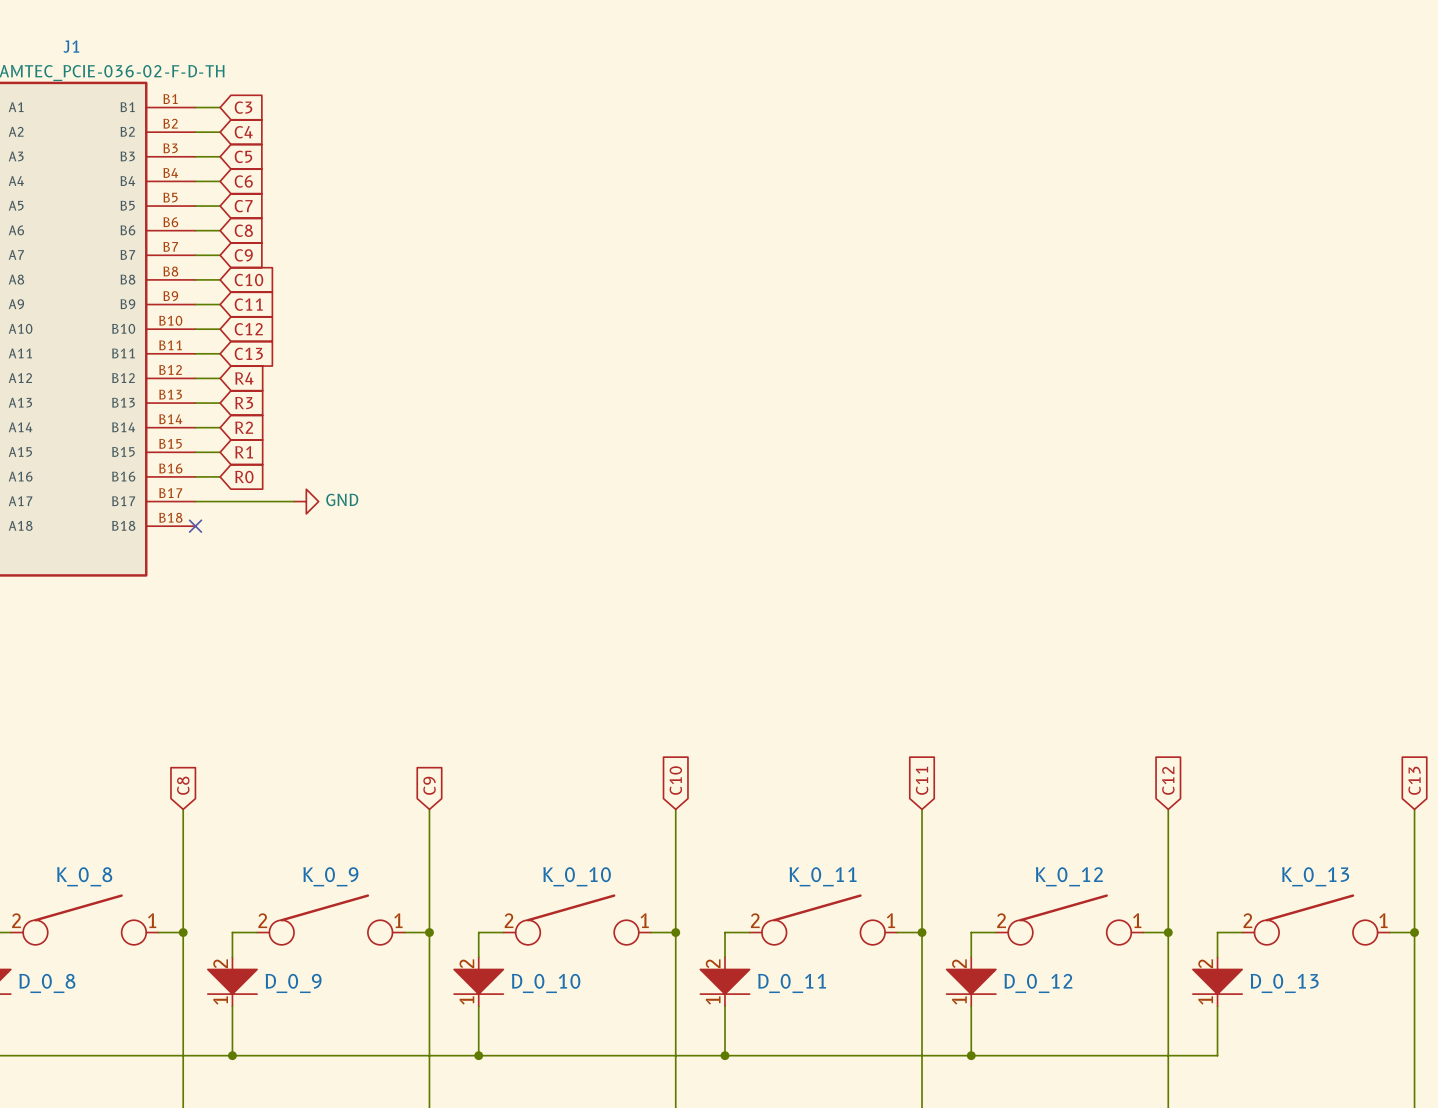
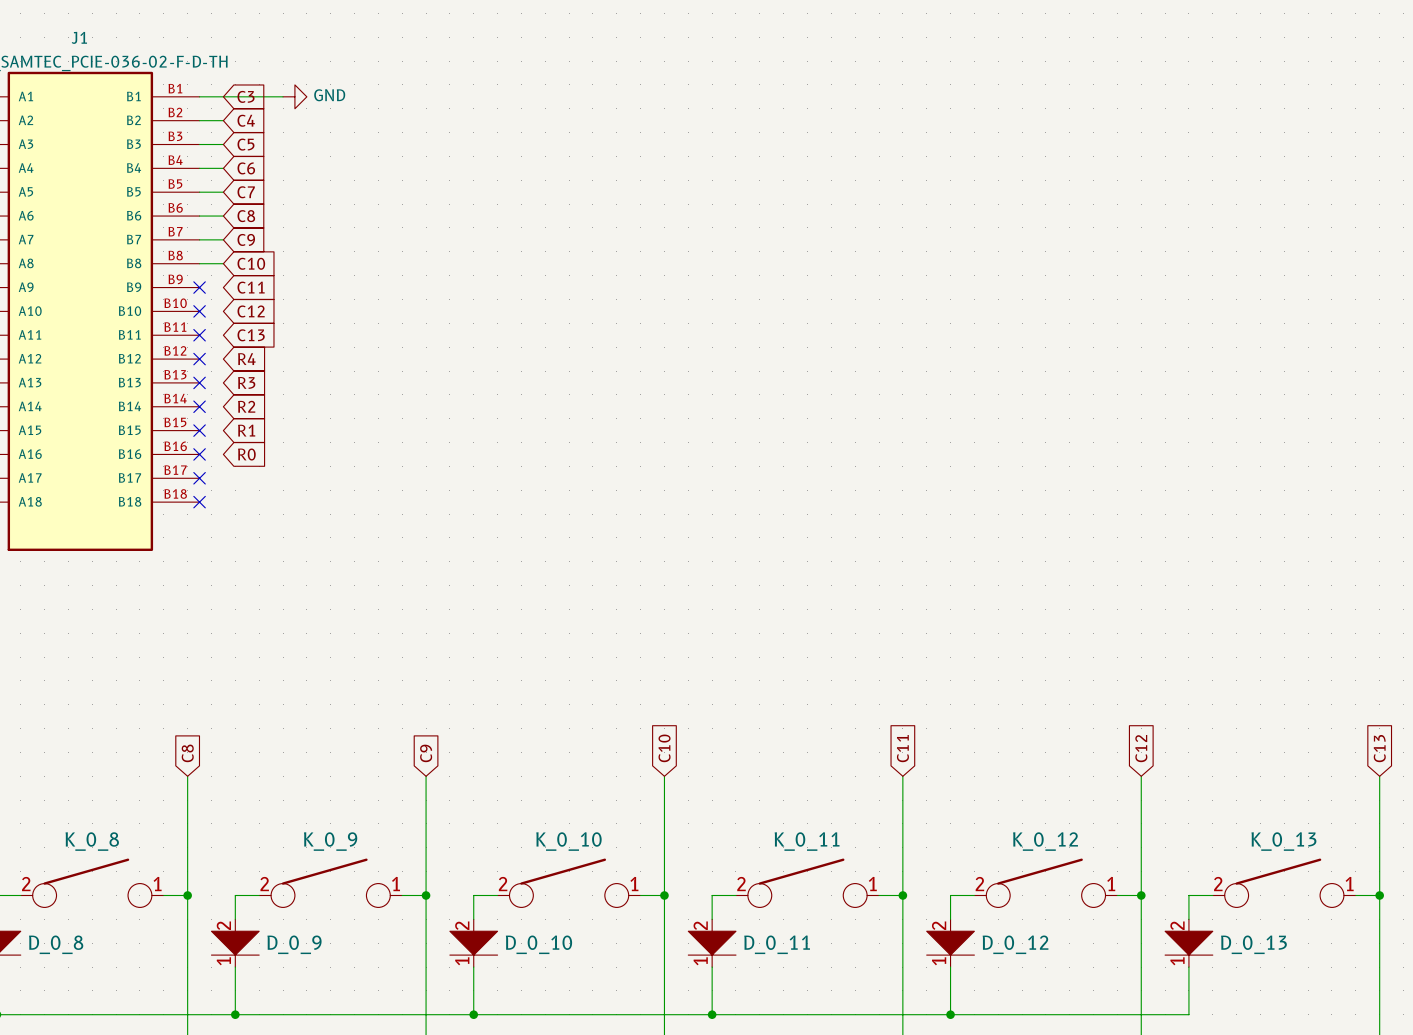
wire: none -> (223, 96) (283, 96)
power symbol: none -> GND (294, 96)
wire: (195, 304) (220, 304) -> none
no-connect mark: none -> (199, 287)
wire: (195, 329) (220, 329) -> none
no-connect mark: none -> (199, 311)
wire: (195, 353) (220, 353) -> none
no-connect mark: none -> (199, 335)
wire: (195, 378) (220, 378) -> none
no-connect mark: none -> (199, 359)
wire: (195, 403) (220, 403) -> none
no-connect mark: none -> (199, 382)
wire: (195, 427) (220, 427) -> none
no-connect mark: none -> (199, 406)
wire: (195, 452) (220, 452) -> none
no-connect mark: none -> (199, 430)
wire: (195, 476) (220, 476) -> none
no-connect mark: none -> (199, 454)
wire: (195, 501) (294, 501) -> none
no-connect mark: none -> (199, 478)
power symbol: GND (306, 501) -> none

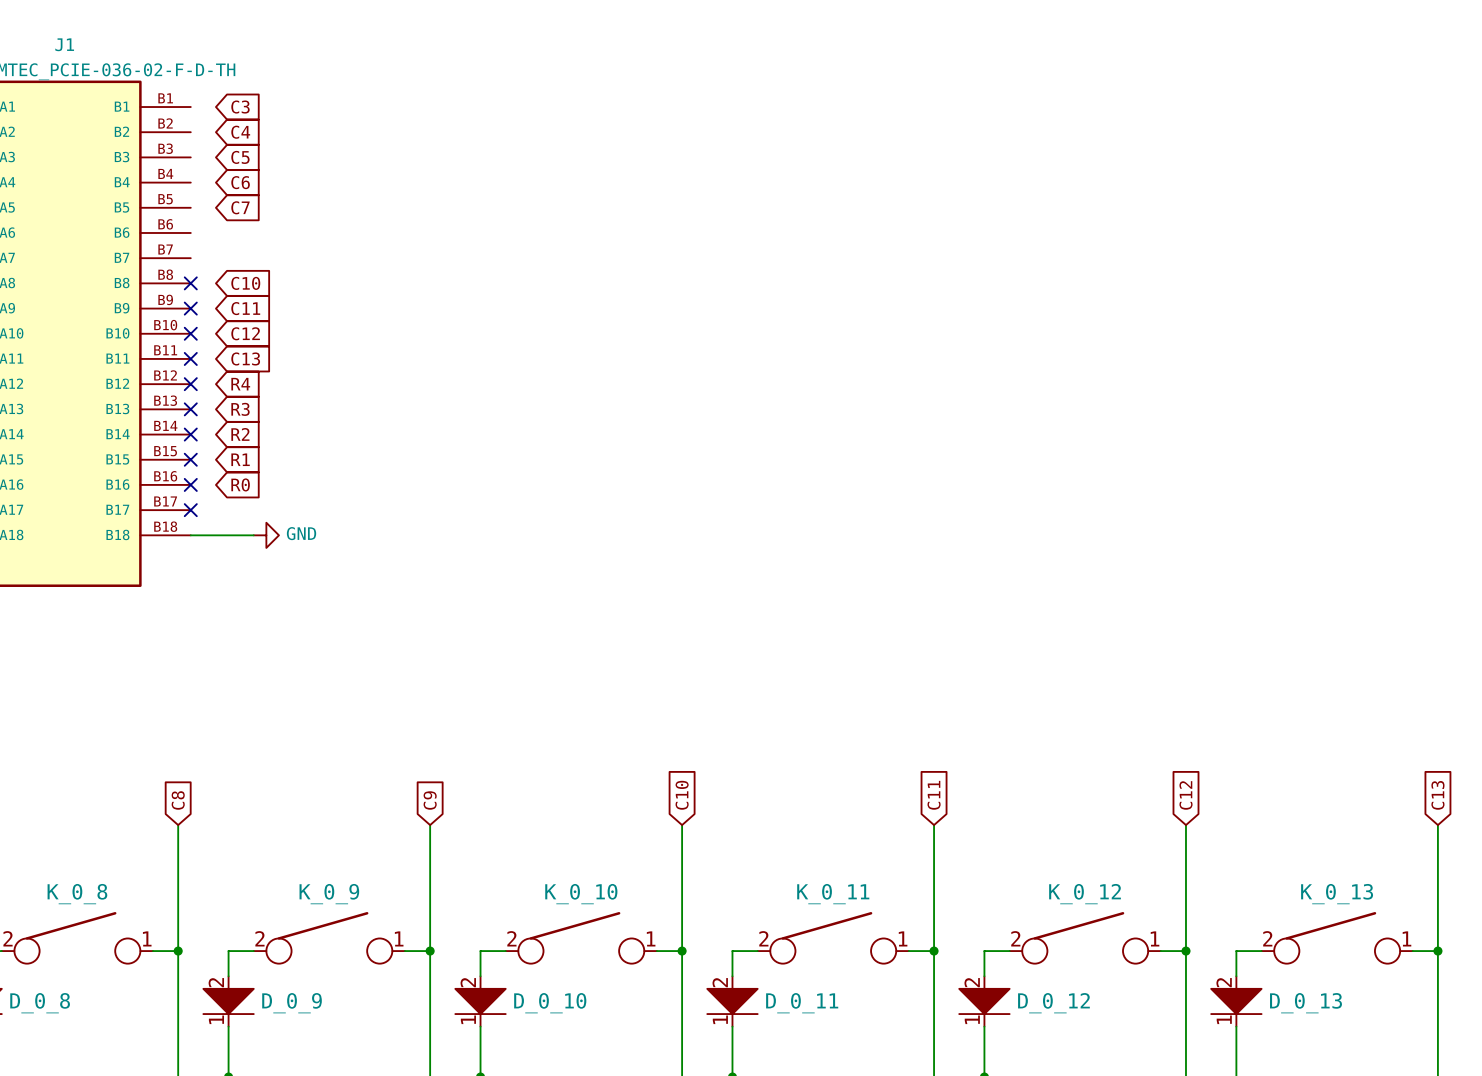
wire: (199, 96) (283, 96) -> none
power symbol: GND (294, 96) -> none
wire: (199, 120) (223, 120) -> none
wire: (199, 144) (223, 144) -> none
wire: (199, 168) (223, 168) -> none
wire: (199, 192) (223, 192) -> none
wire: (199, 216) (223, 216) -> none
global label: C8 (246, 216) -> none
wire: (199, 239) (223, 239) -> none
global label: C9 (246, 239) -> none
wire: (199, 263) (223, 263) -> none
no-connect mark: none -> (190, 283)
wire: none -> (190, 535) (253, 535)
no-connect mark: (199, 502) -> none
power symbol: none -> GND (266, 535)

